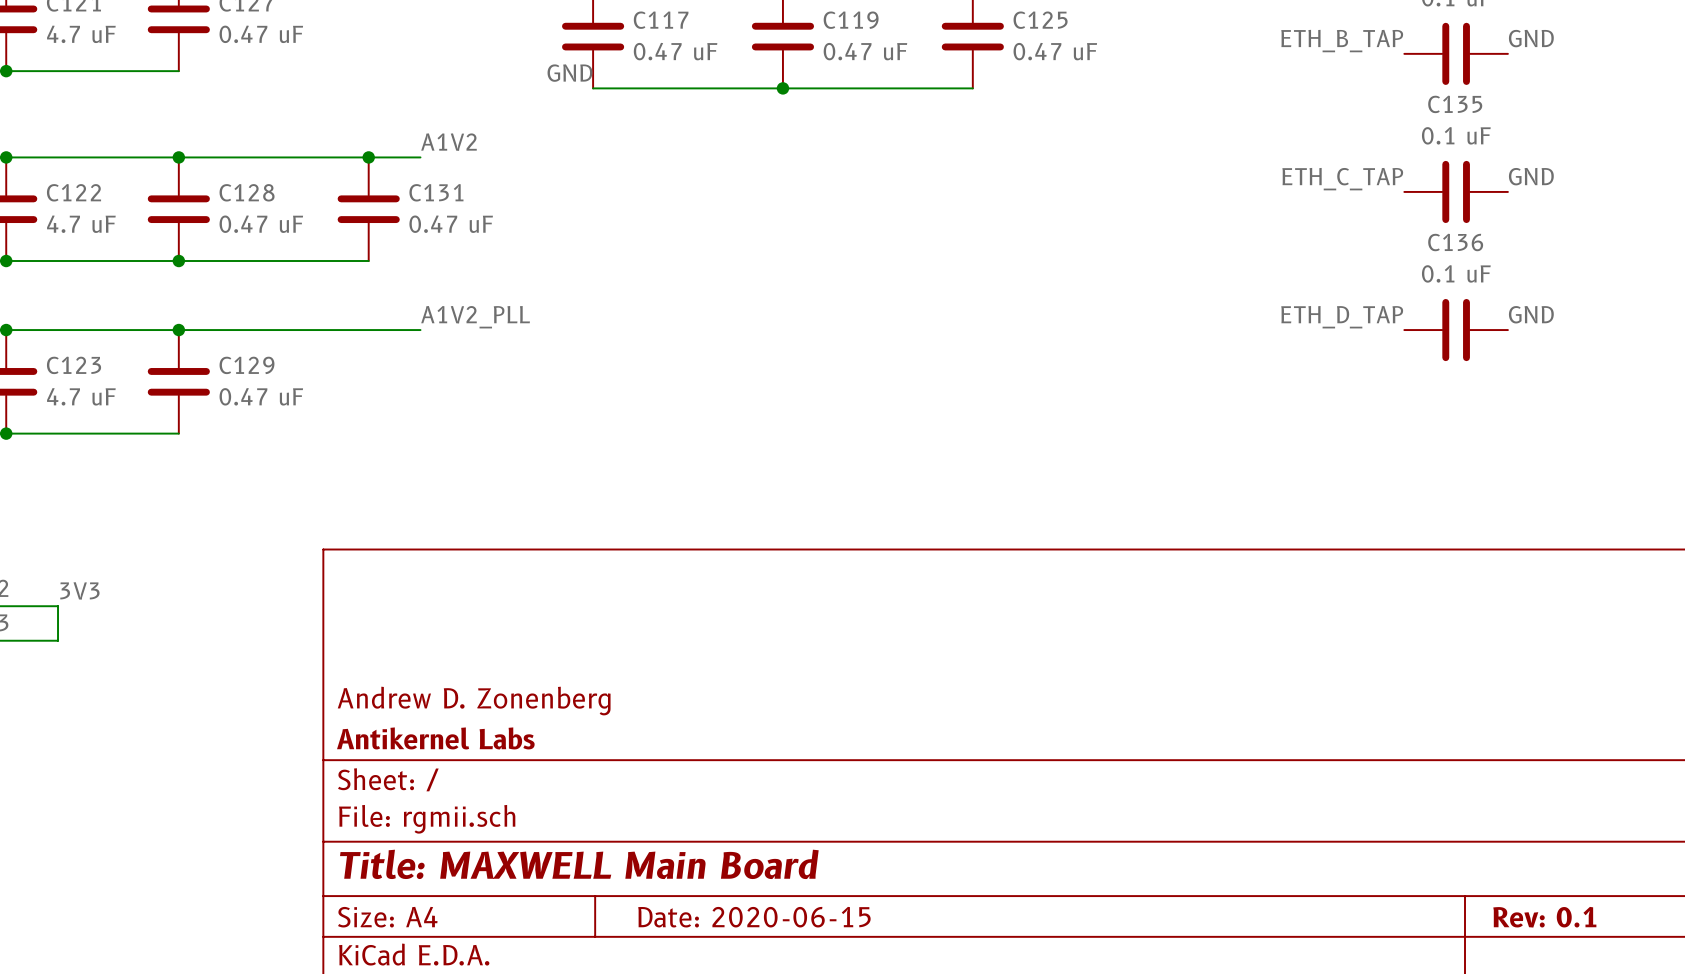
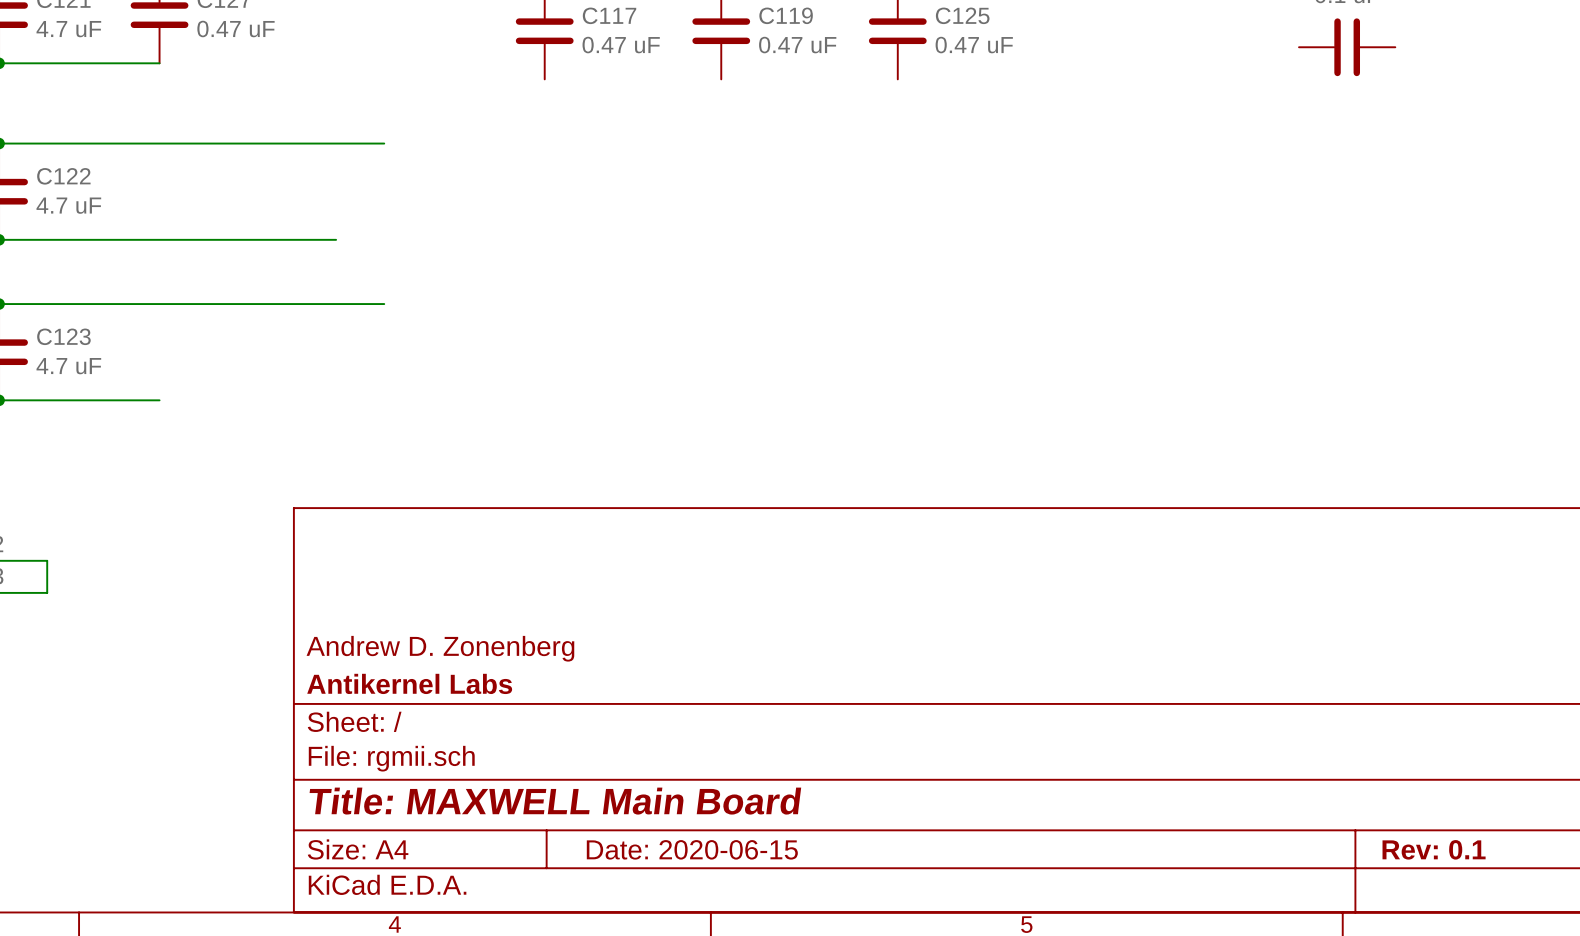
label: GND (1531, 38) -> none
label: ETH_B_TAP (1342, 41) -> none
label: GND (569, 73) -> none
wire: (593, 88) (972, 88) -> none
junction: (782, 88) -> none
label: A1V2 (448, 142) -> none
junction: (178, 157) -> none
junction: (368, 157) -> none
label: GND (1531, 176) -> none
label: ETH_C_TAP (1342, 179) -> none
C135: 0.1 uF (1456, 191) -> none
C128: 0.47 uF (178, 209) -> none
C131: 0.47 uF (368, 209) -> none
junction: (178, 261) -> none
label: GND (1531, 314) -> none
label: A1V2_PLL (475, 317) -> none
label: ETH_D_TAP (1342, 317) -> none
junction: (178, 330) -> none
C136: 0.1 uF (1456, 330) -> none
C129: 0.47 uF (178, 381) -> none
label: 3V3 (79, 590) -> none

